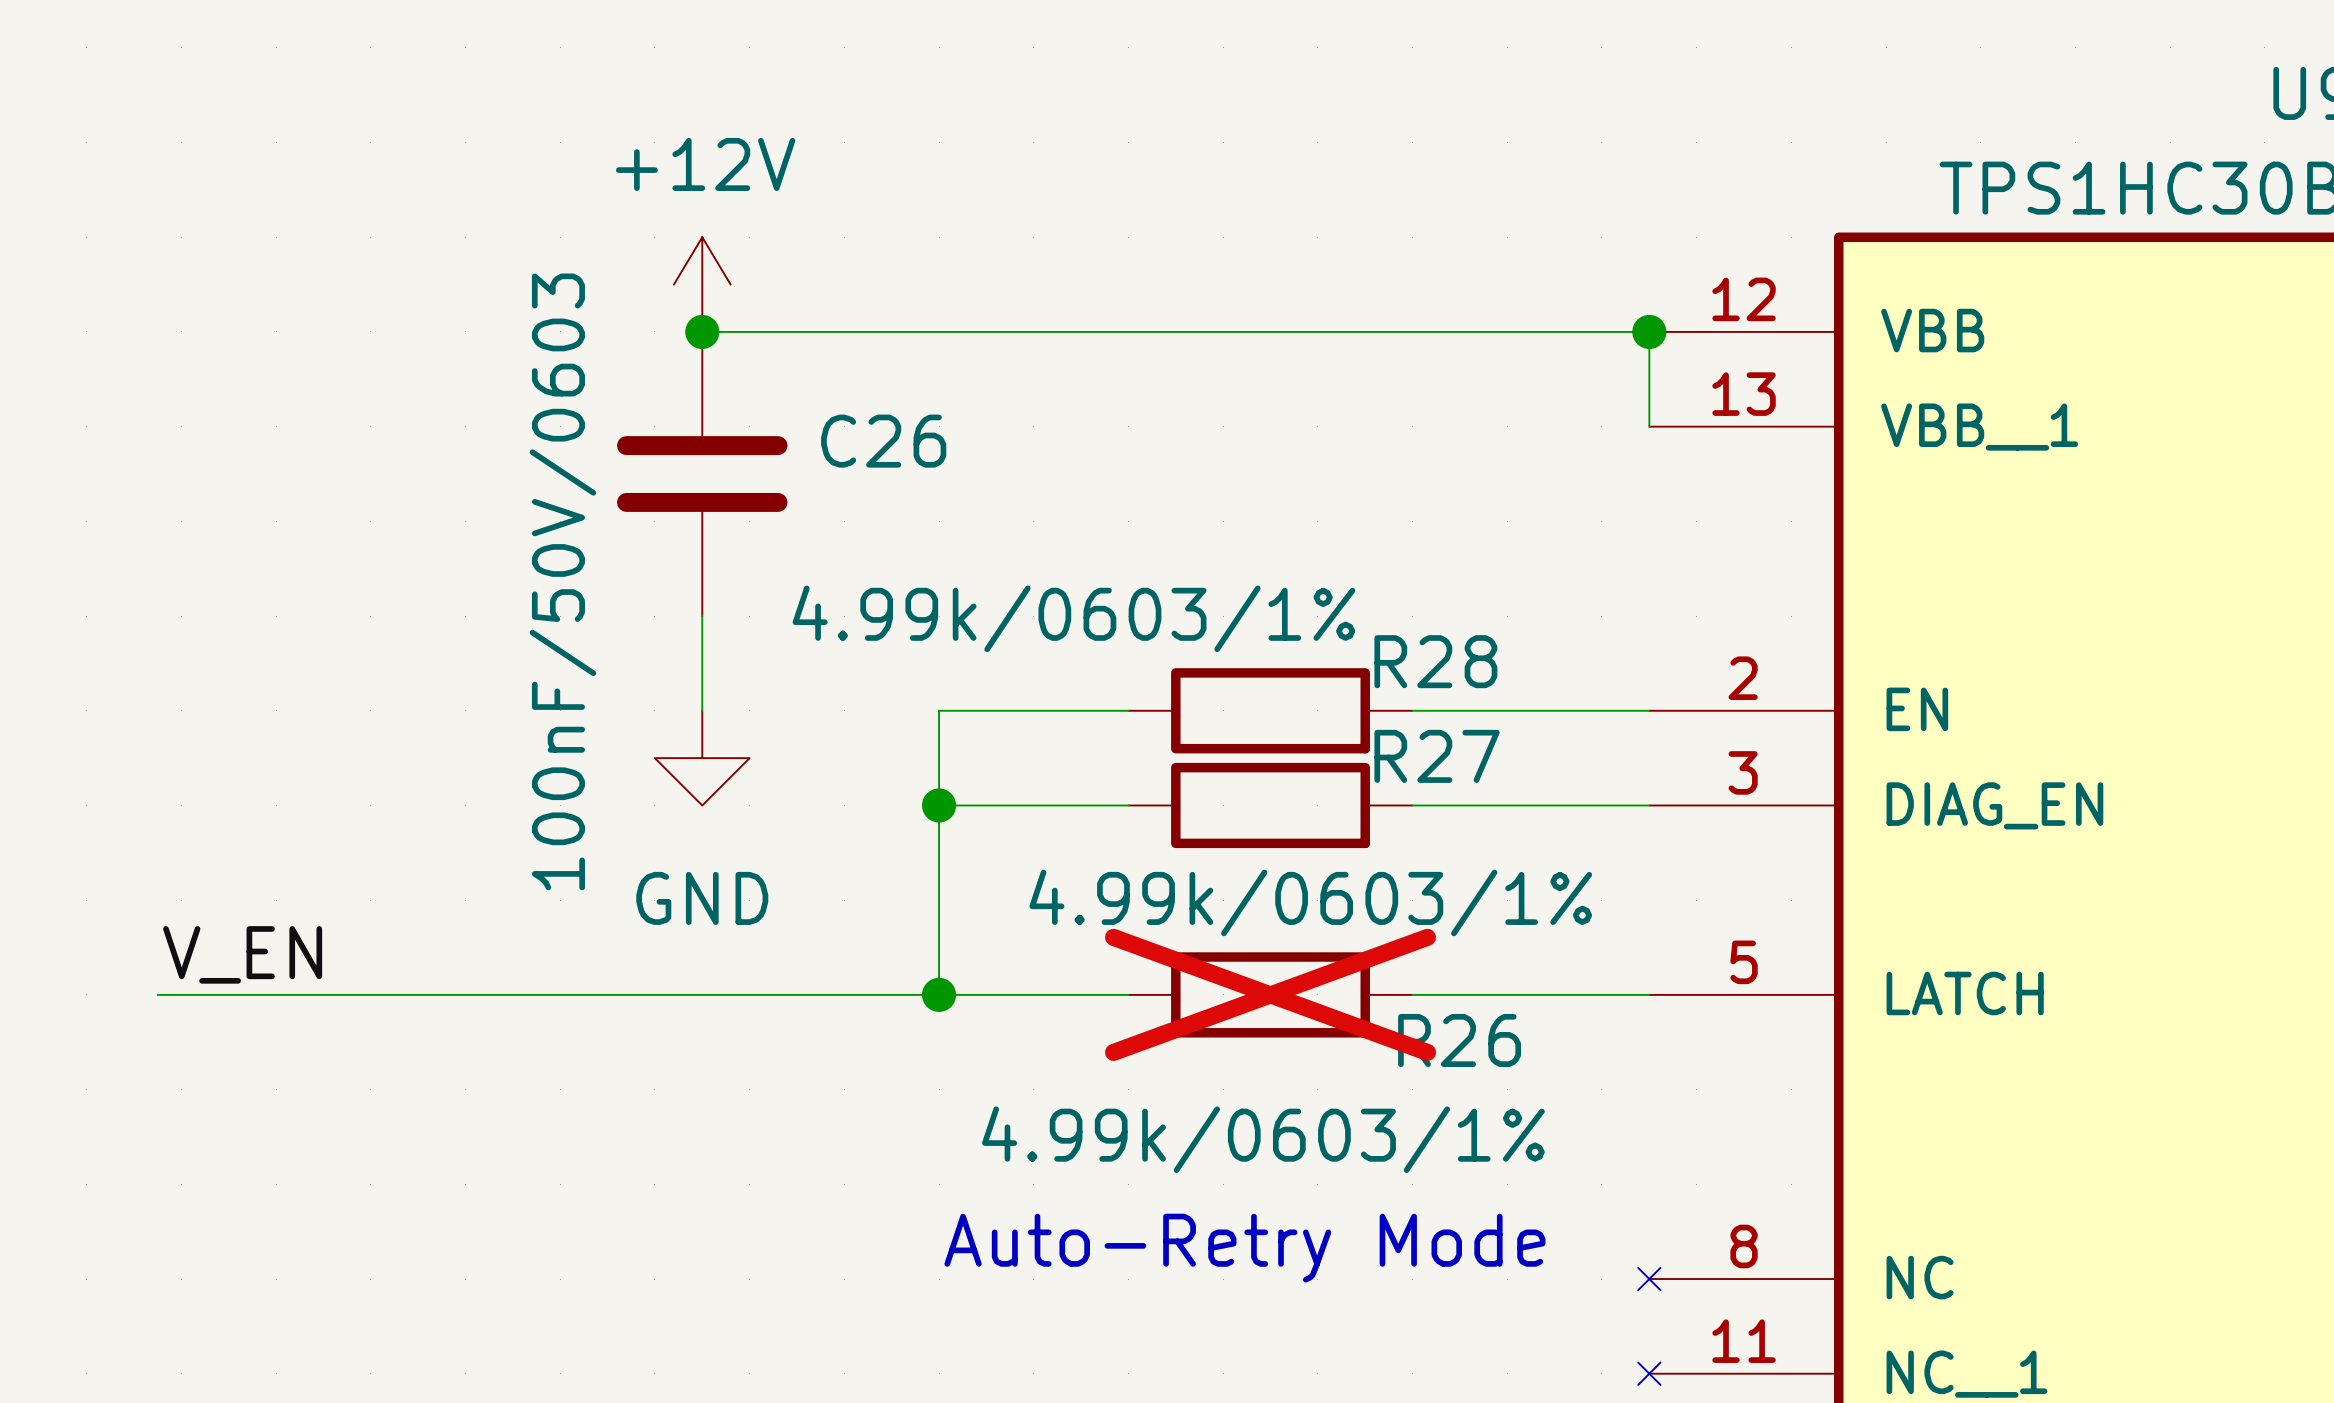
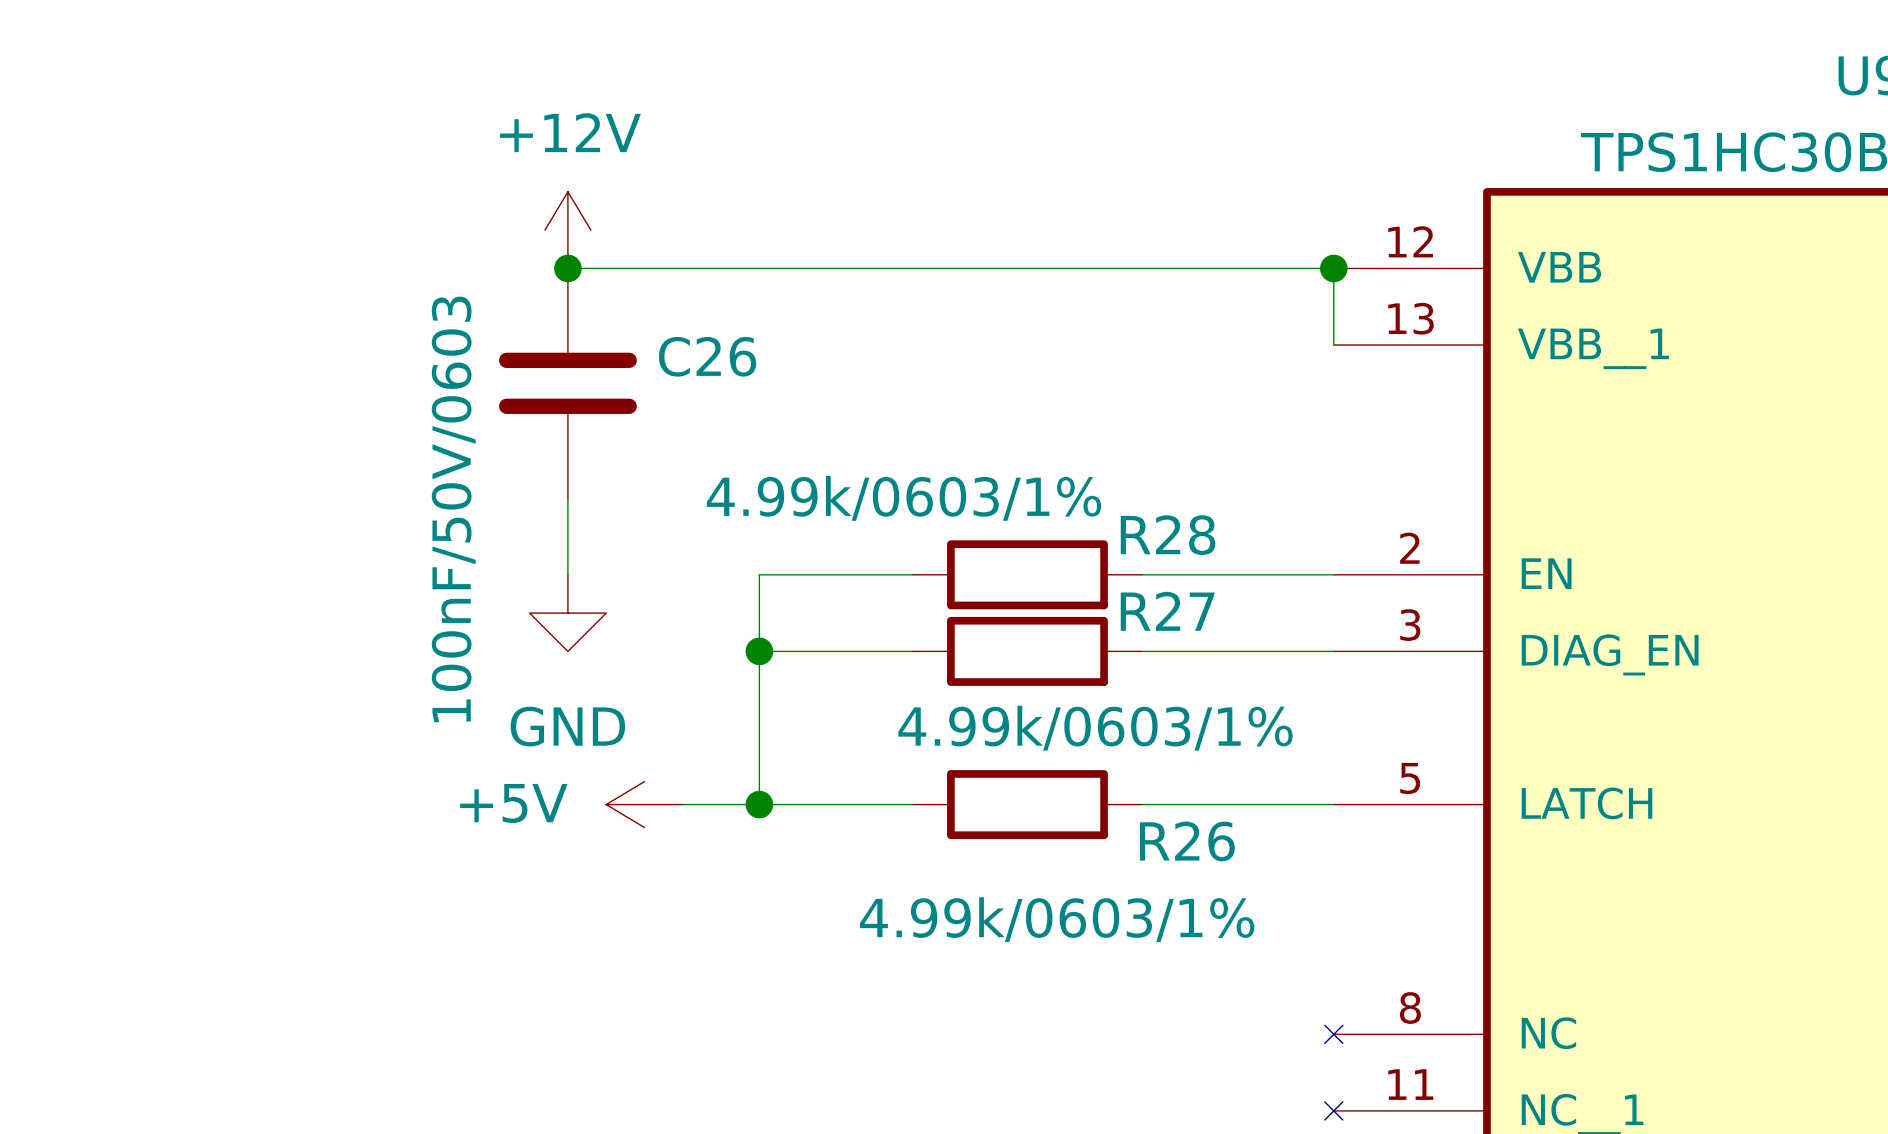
label: V_EN (242, 954) -> none
wire: (157, 994) (844, 994) -> none
power symbol: none -> +5V (644, 804)
R26 do-not-place cross: (1270, 994) -> none
text: Auto-Retry Mode (1244, 1248) -> none

